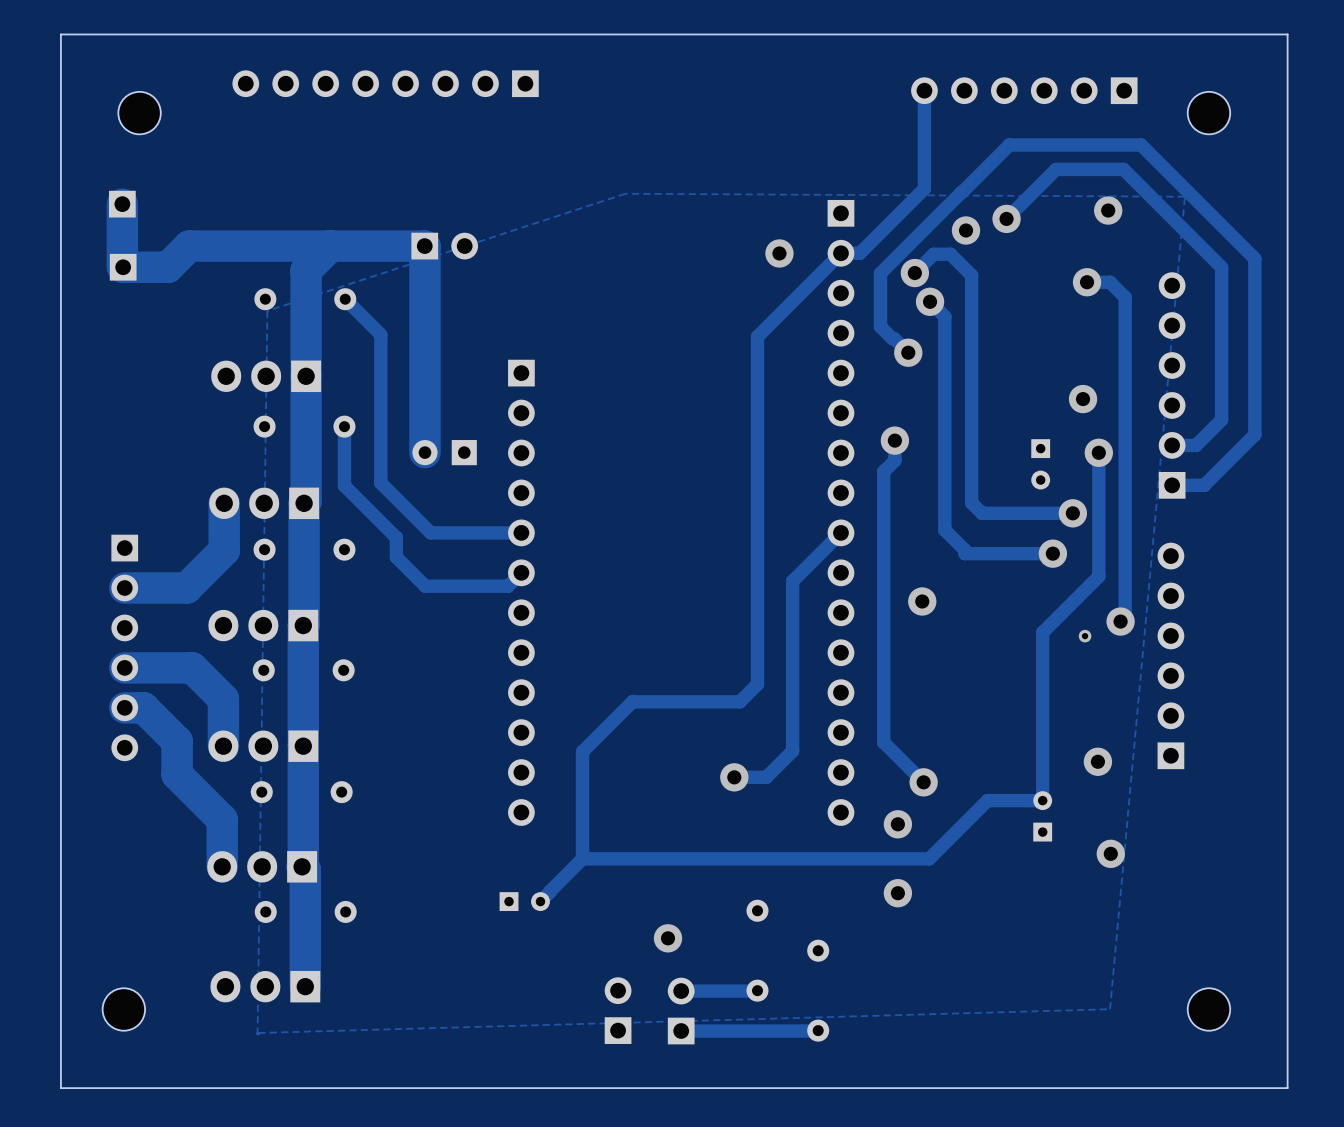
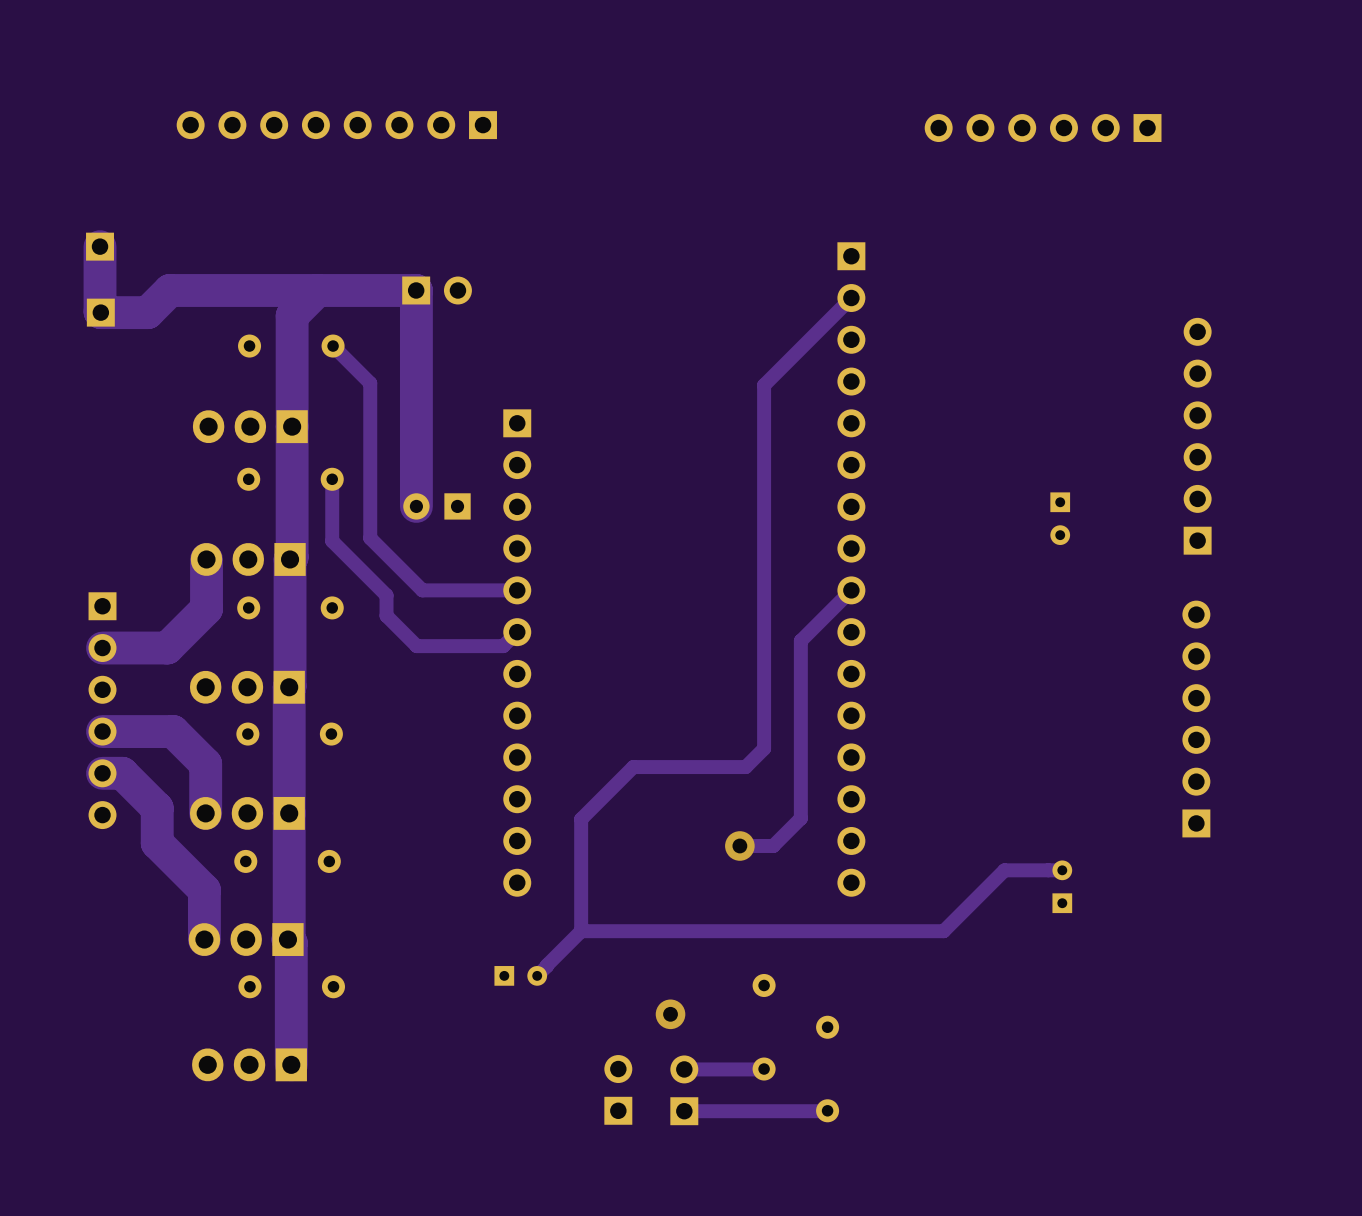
board edge: (1287, 34) (1287, 1088) (60, 1088) (60, 34) (1287, 34) -> none
part position: (385, 83) -> (336, 125)
track: (924, 90) (924, 188) (859, 253) (840, 253) -> none
part: (139, 113) -> none
part: (1208, 113) -> none
via: (1108, 210) -> none
track: (1006, 218) (1056, 169) (1123, 169) (1221, 267) (1221, 419) (1196, 445) (1172, 445) -> none
via: (1006, 218) -> none
via: (966, 230) -> none
via: (779, 253) -> none
track: (914, 273) (933, 254) (950, 254) (971, 275) (971, 502) (981, 513) (1072, 513) -> none
via: (914, 273) -> none
track: (1087, 282) (1110, 282) (1125, 297) (1125, 614) -> none
via: (1087, 282) -> none
track: (930, 301) (944, 316) (944, 530) (965, 550) (965, 553) (1052, 553) -> none
via: (930, 301) -> none
track: (908, 352) (880, 326) (880, 273) (1009, 145) (1141, 145) (1254, 258) (1254, 434) (1204, 485) (1172, 485) -> none
via: (908, 352) -> none
via: (1083, 399) -> none
track: (894, 440) (894, 460) (883, 471) (883, 742) (923, 782) -> none
via: (894, 440) -> none
track: (1098, 452) (1098, 576) (1042, 632) (1042, 800) -> none
via: (1098, 452) -> none
via: (1072, 513) -> none
via: (1052, 553) -> none
via: (922, 601) -> none
via: (1120, 621) -> none
via: (1085, 636) -> none
via: (1097, 761) -> none
via: (923, 782) -> none
via: (897, 824) -> none
via: (1110, 853) -> none
via: (897, 893) -> none
part: (123, 1009) -> none
part: (1208, 1009) -> none
zone outline: (258, 1033) (1110, 1009) (1184, 196) (625, 193) (267, 310) (257, 1033) (258, 1034) (256, 1033) (259, 1034) (258, 1033) -> none

